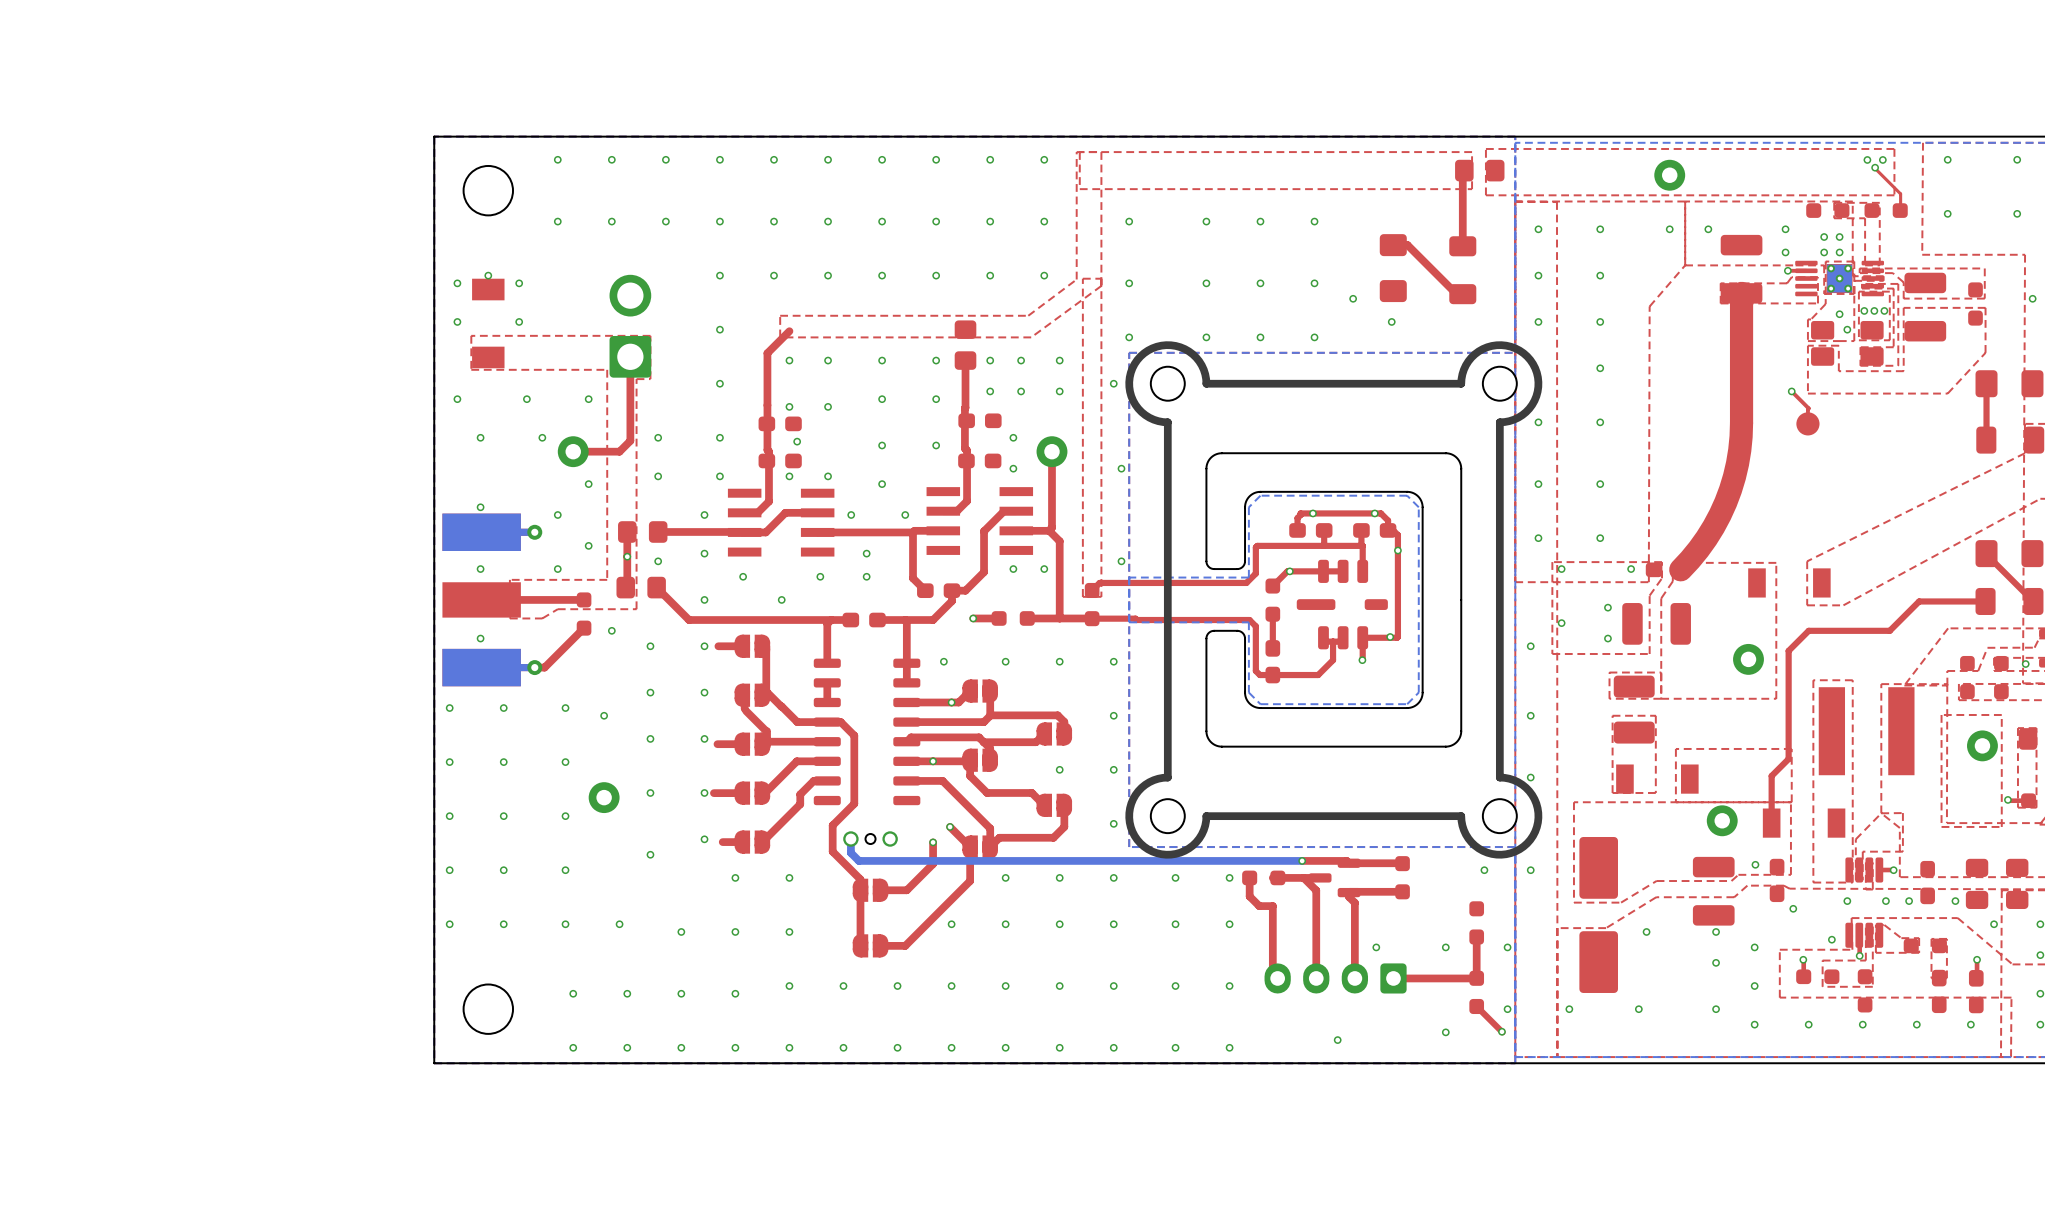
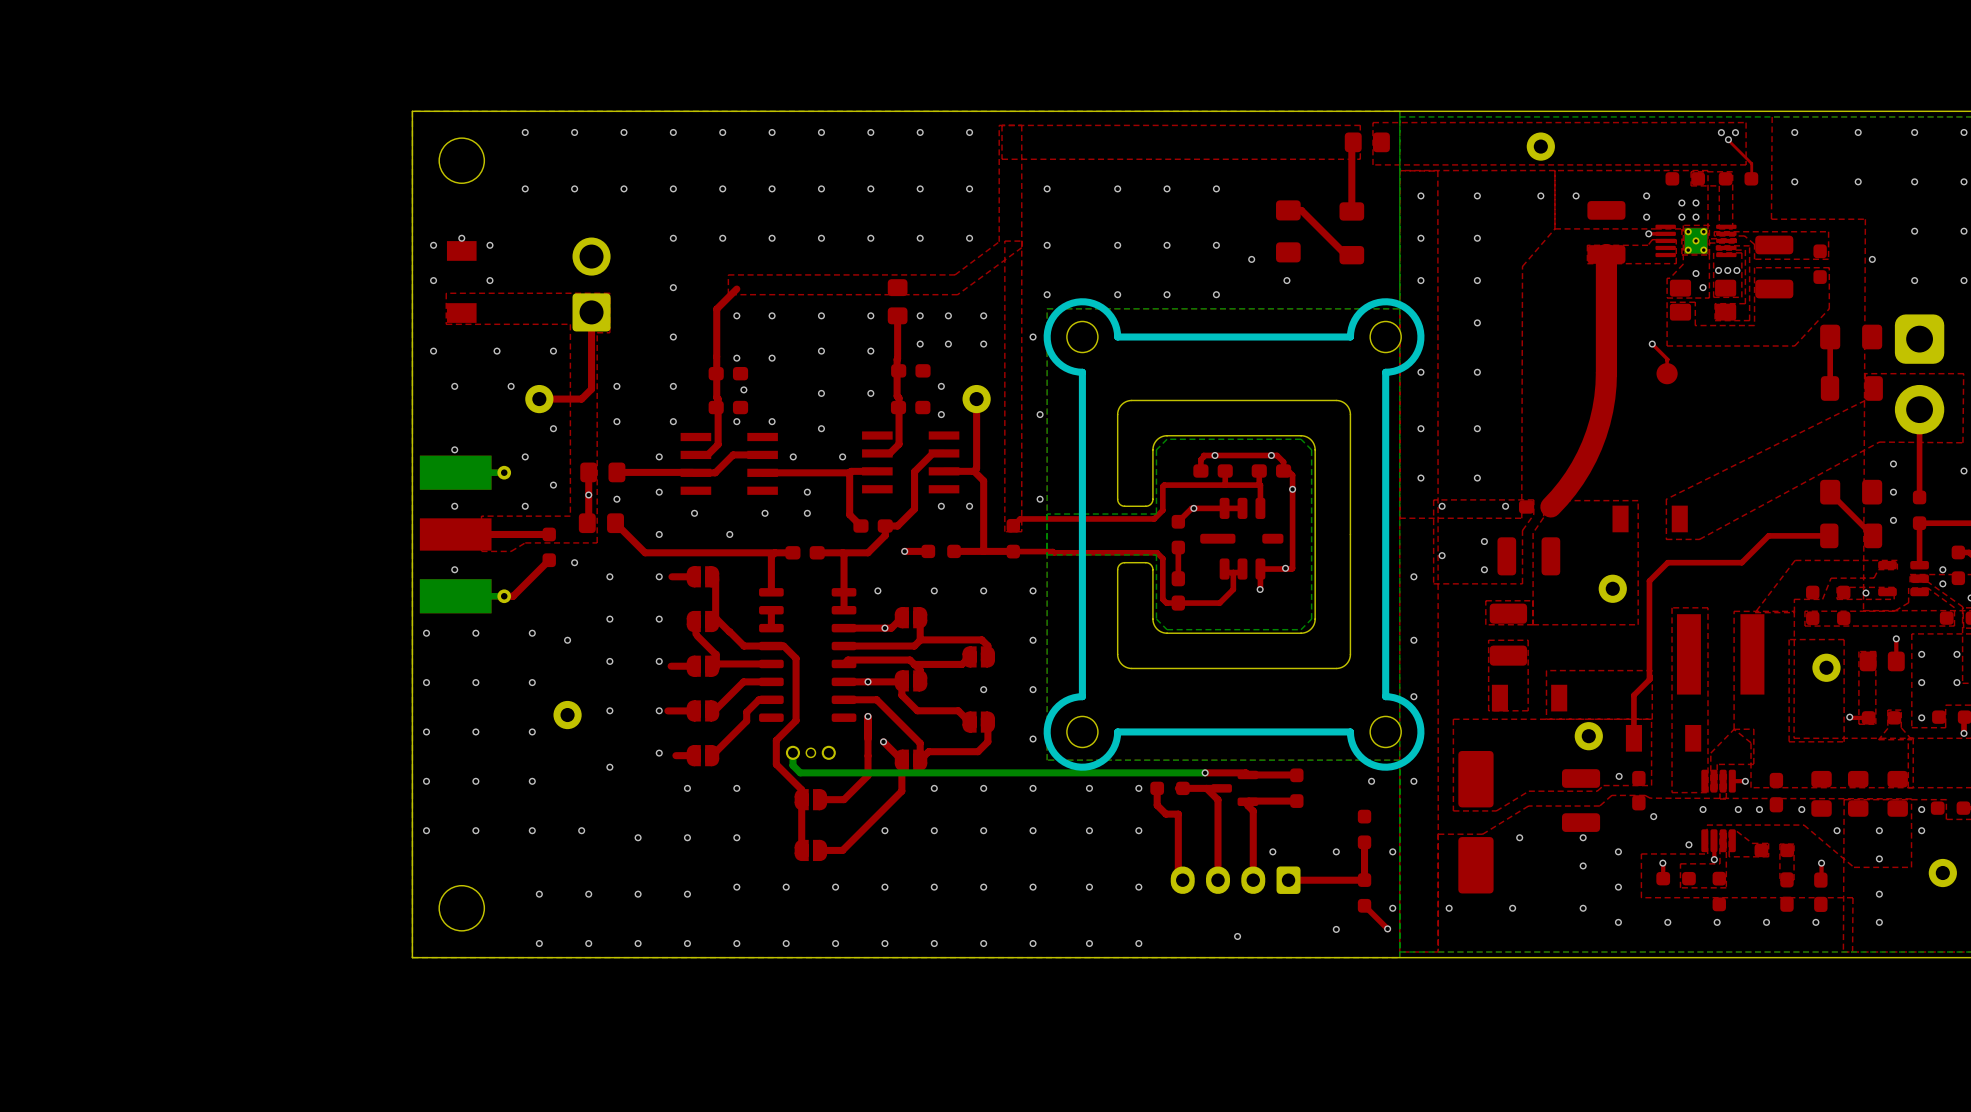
top track: none -> (868, 716) (868, 755)
via position: (933, 842) -> (868, 716)

